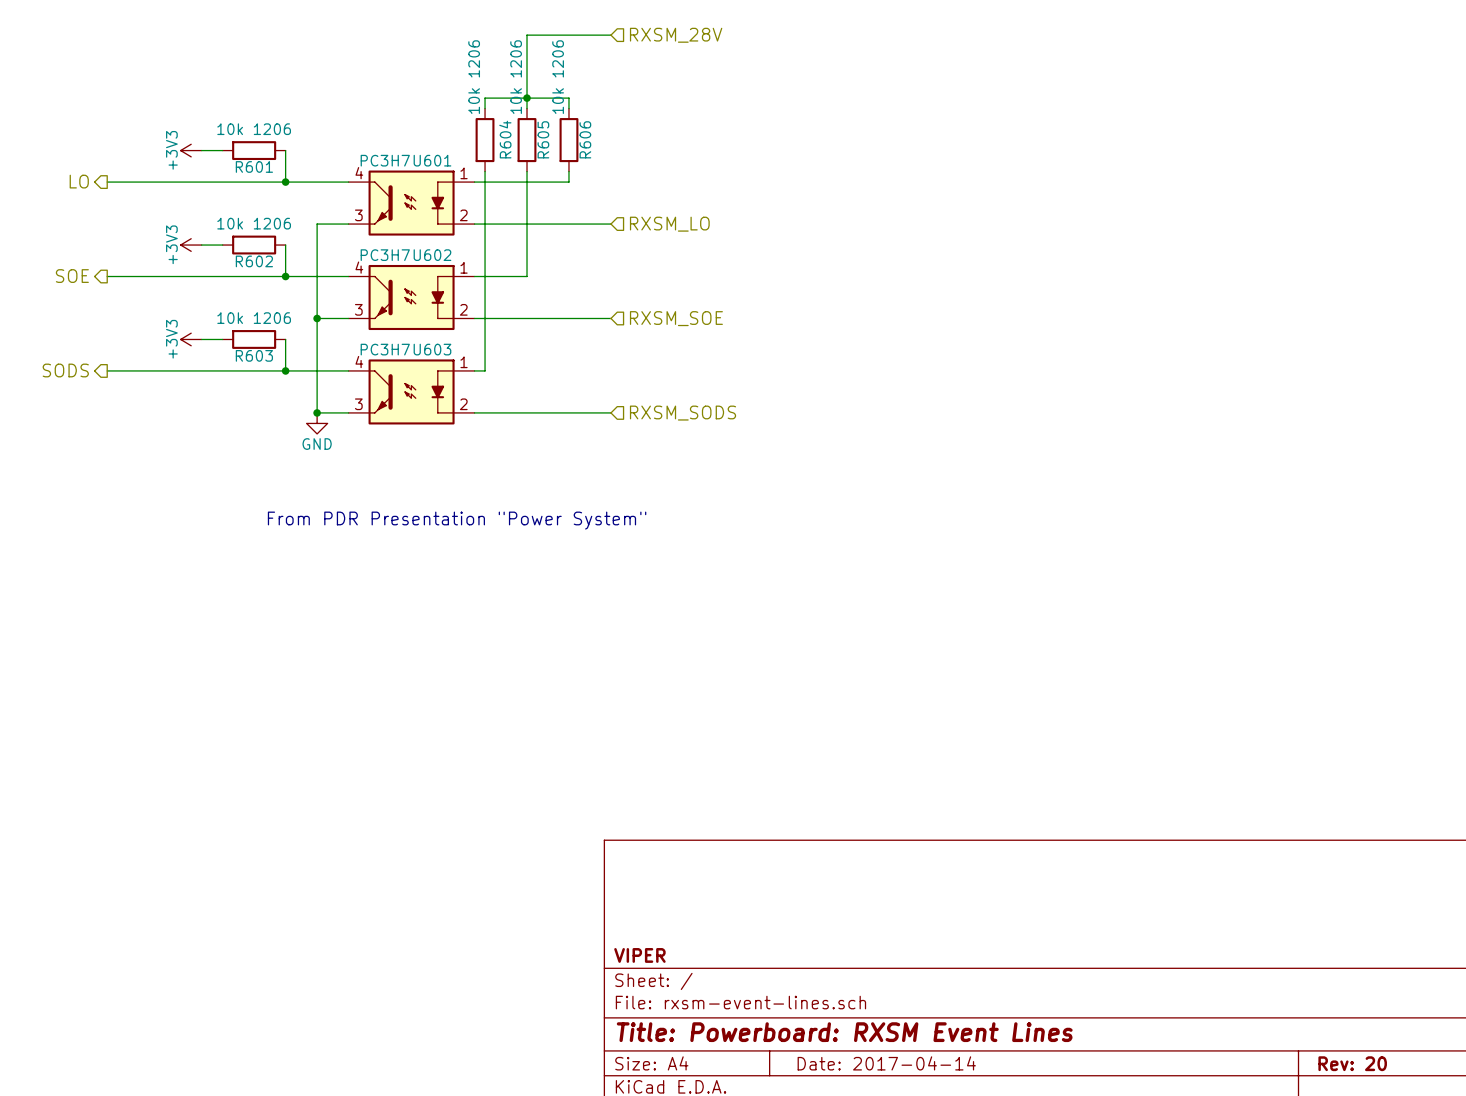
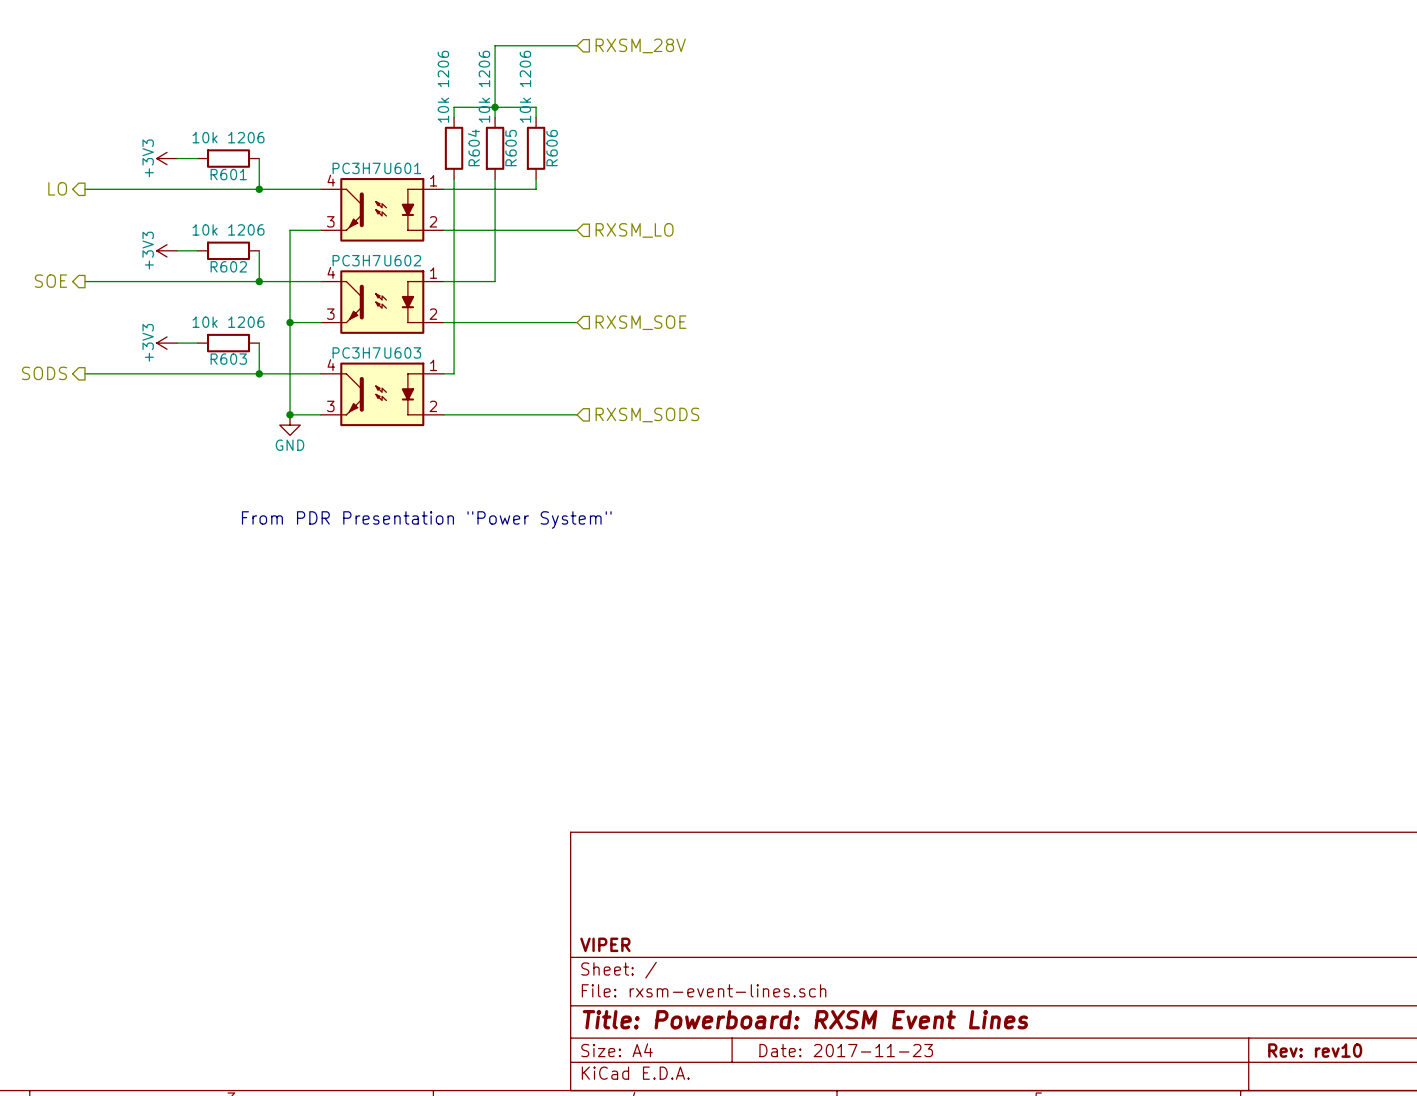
title block: Date: 2017-04-14 (886, 1063) -> Date: 2017-11-23 (846, 1050)
title block: Rev: 20 (1352, 1063) -> Rev: rev10 (1315, 1050)

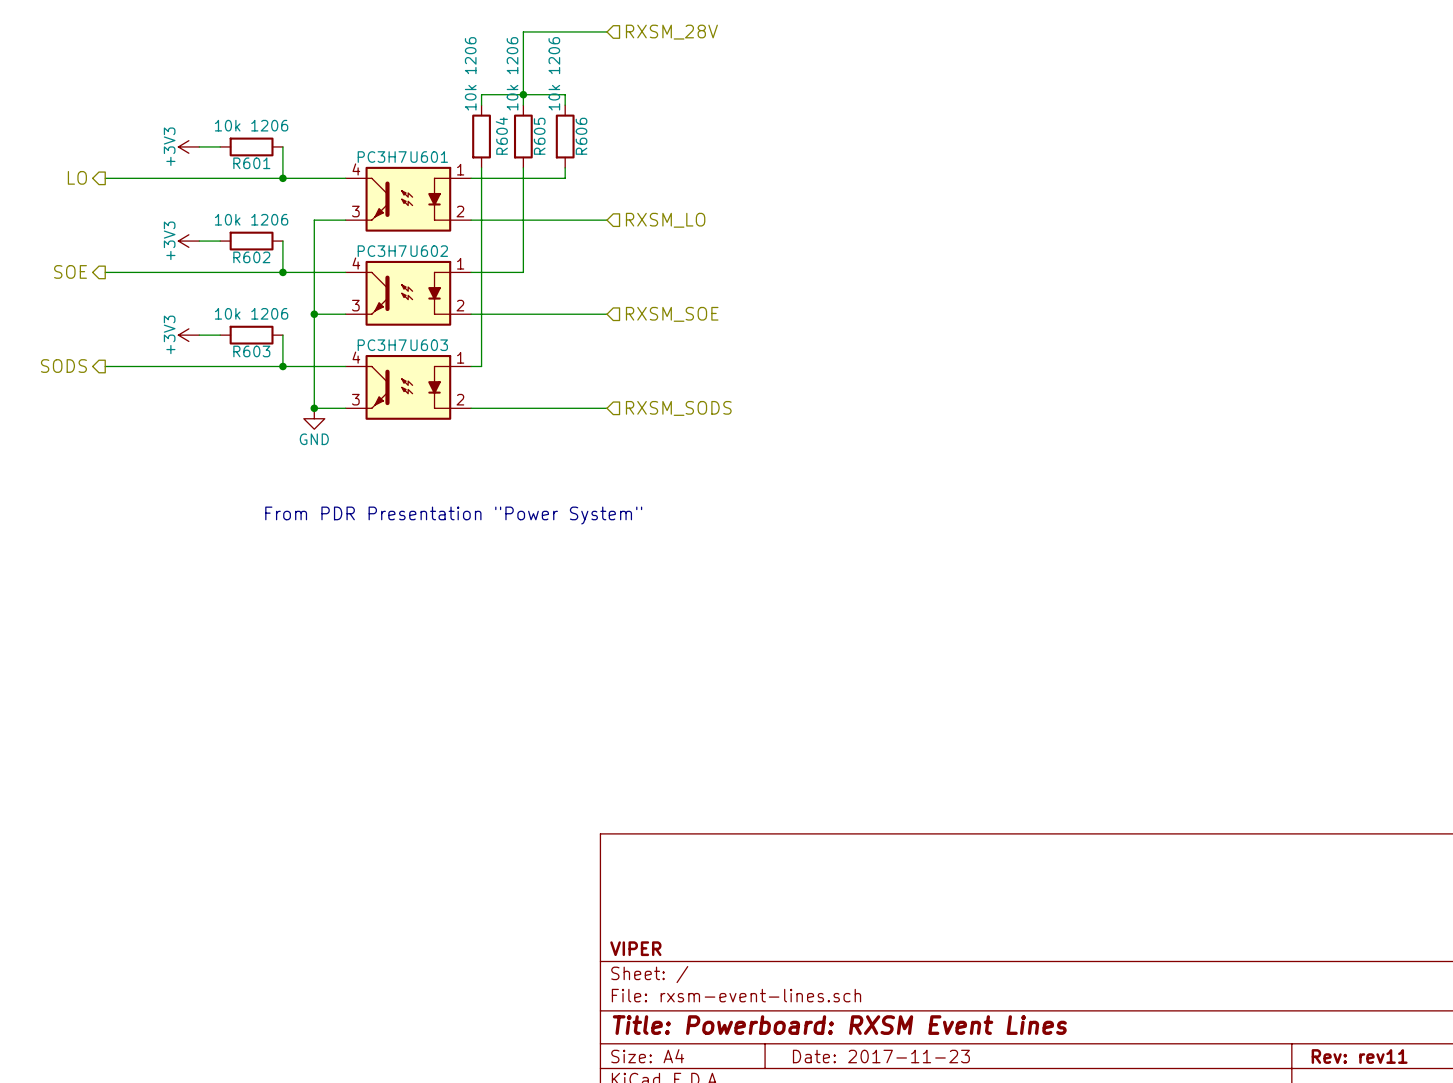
title block: Rev: rev10 (1315, 1050) -> Rev: rev11 (1359, 1056)

